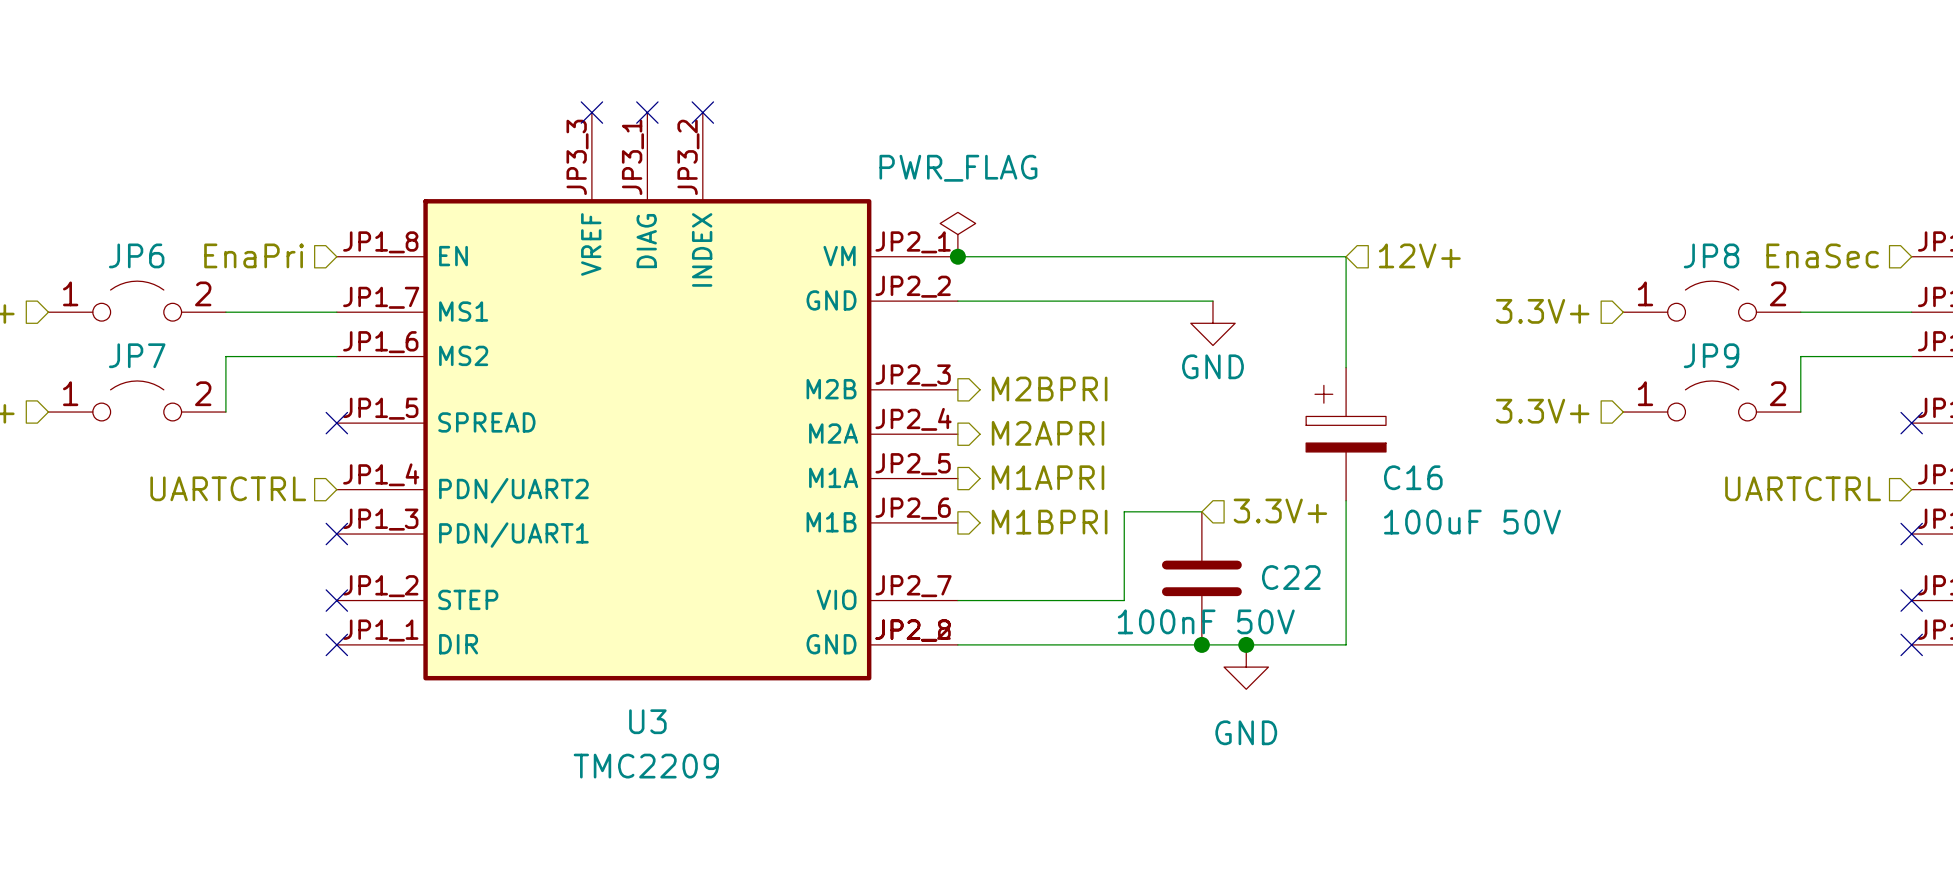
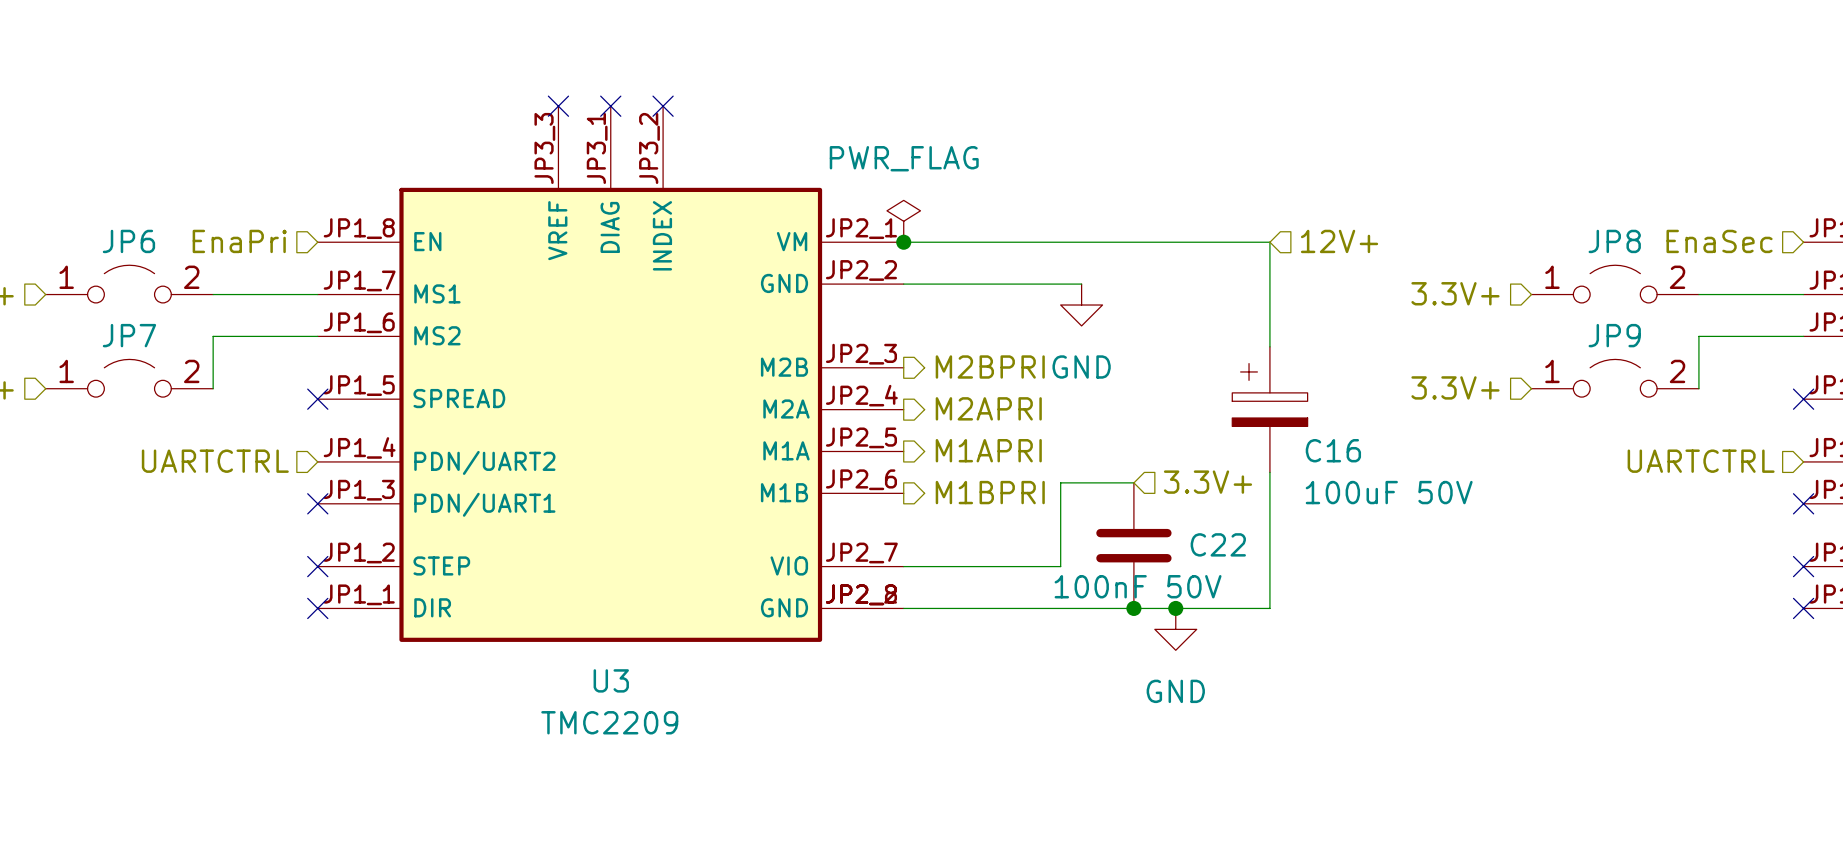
wire: (1146, 301) (1212, 301) -> none
power symbol position: GND (1212, 323) -> GND (1081, 305)
power symbol text position: GND (1212, 366) -> GND (1081, 367)

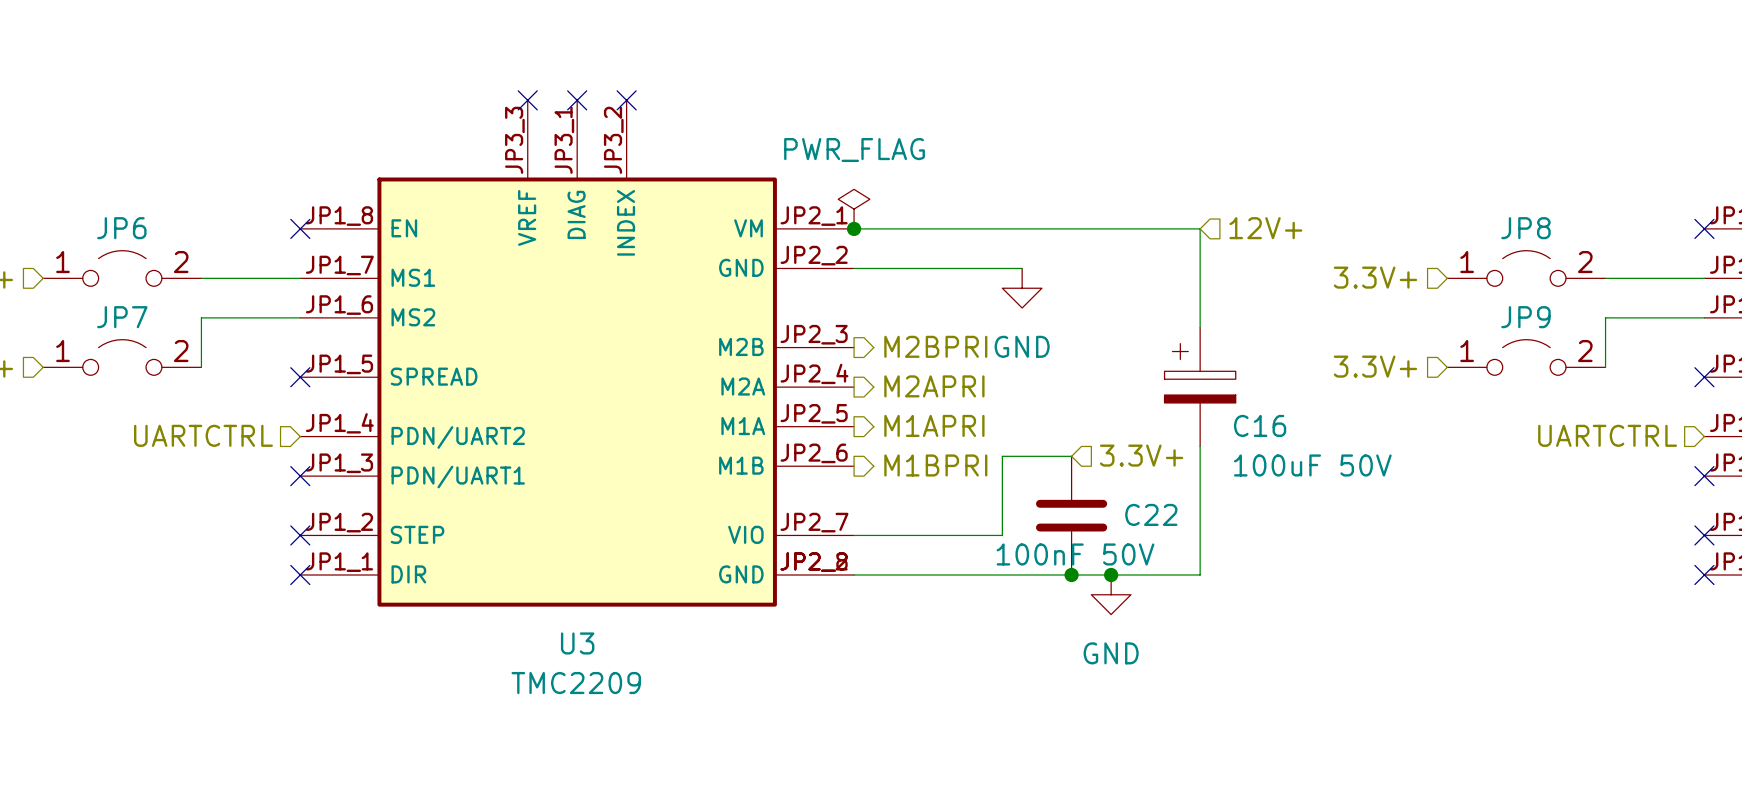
hierarchical label: EnaPri (239, 241) -> none
hierarchical label: EnaSec (1719, 241) -> none
no-connect mark: none -> (300, 228)
no-connect mark: none -> (1704, 228)

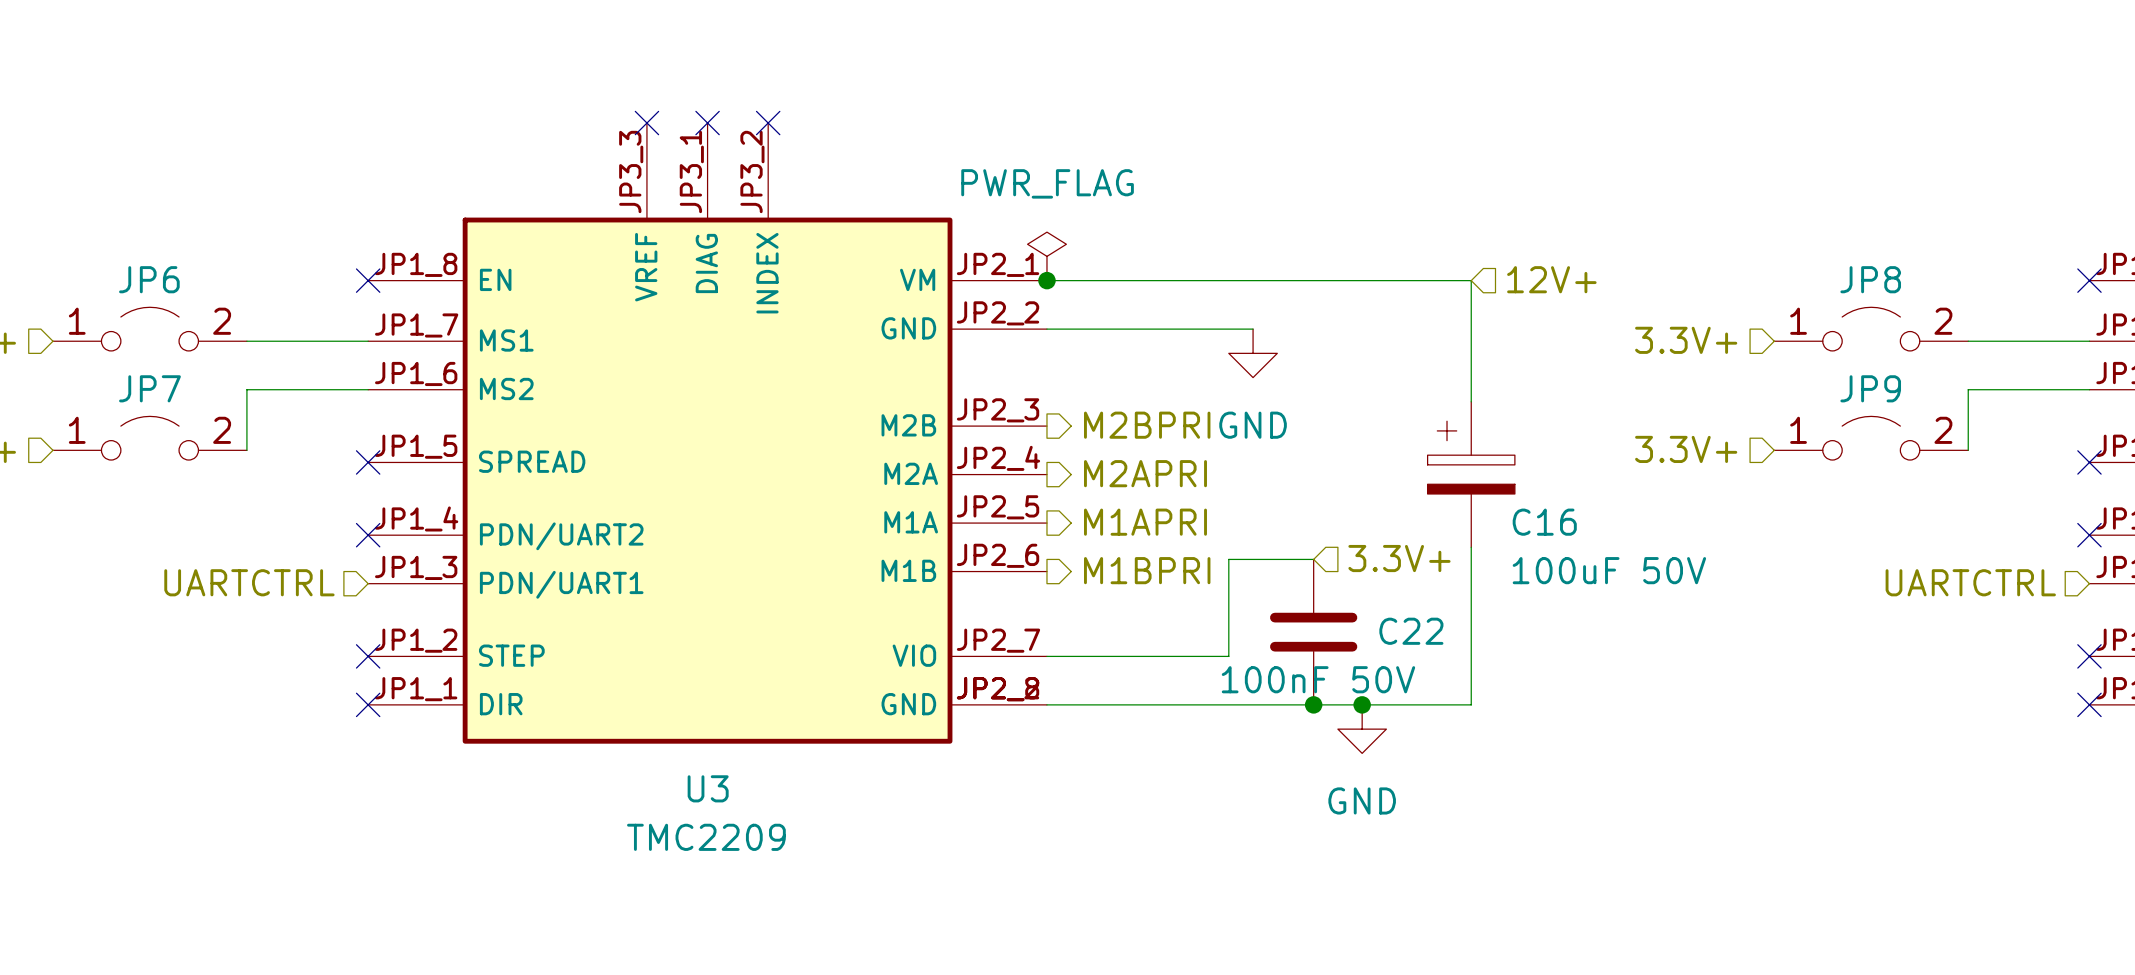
hierarchical label position: UARTCTRL (203, 435) -> UARTCTRL (249, 582)
hierarchical label position: UARTCTRL (1607, 435) -> UARTCTRL (1970, 582)
no-connect mark position: (300, 476) -> (368, 535)
no-connect mark position: (1704, 476) -> (2089, 535)

